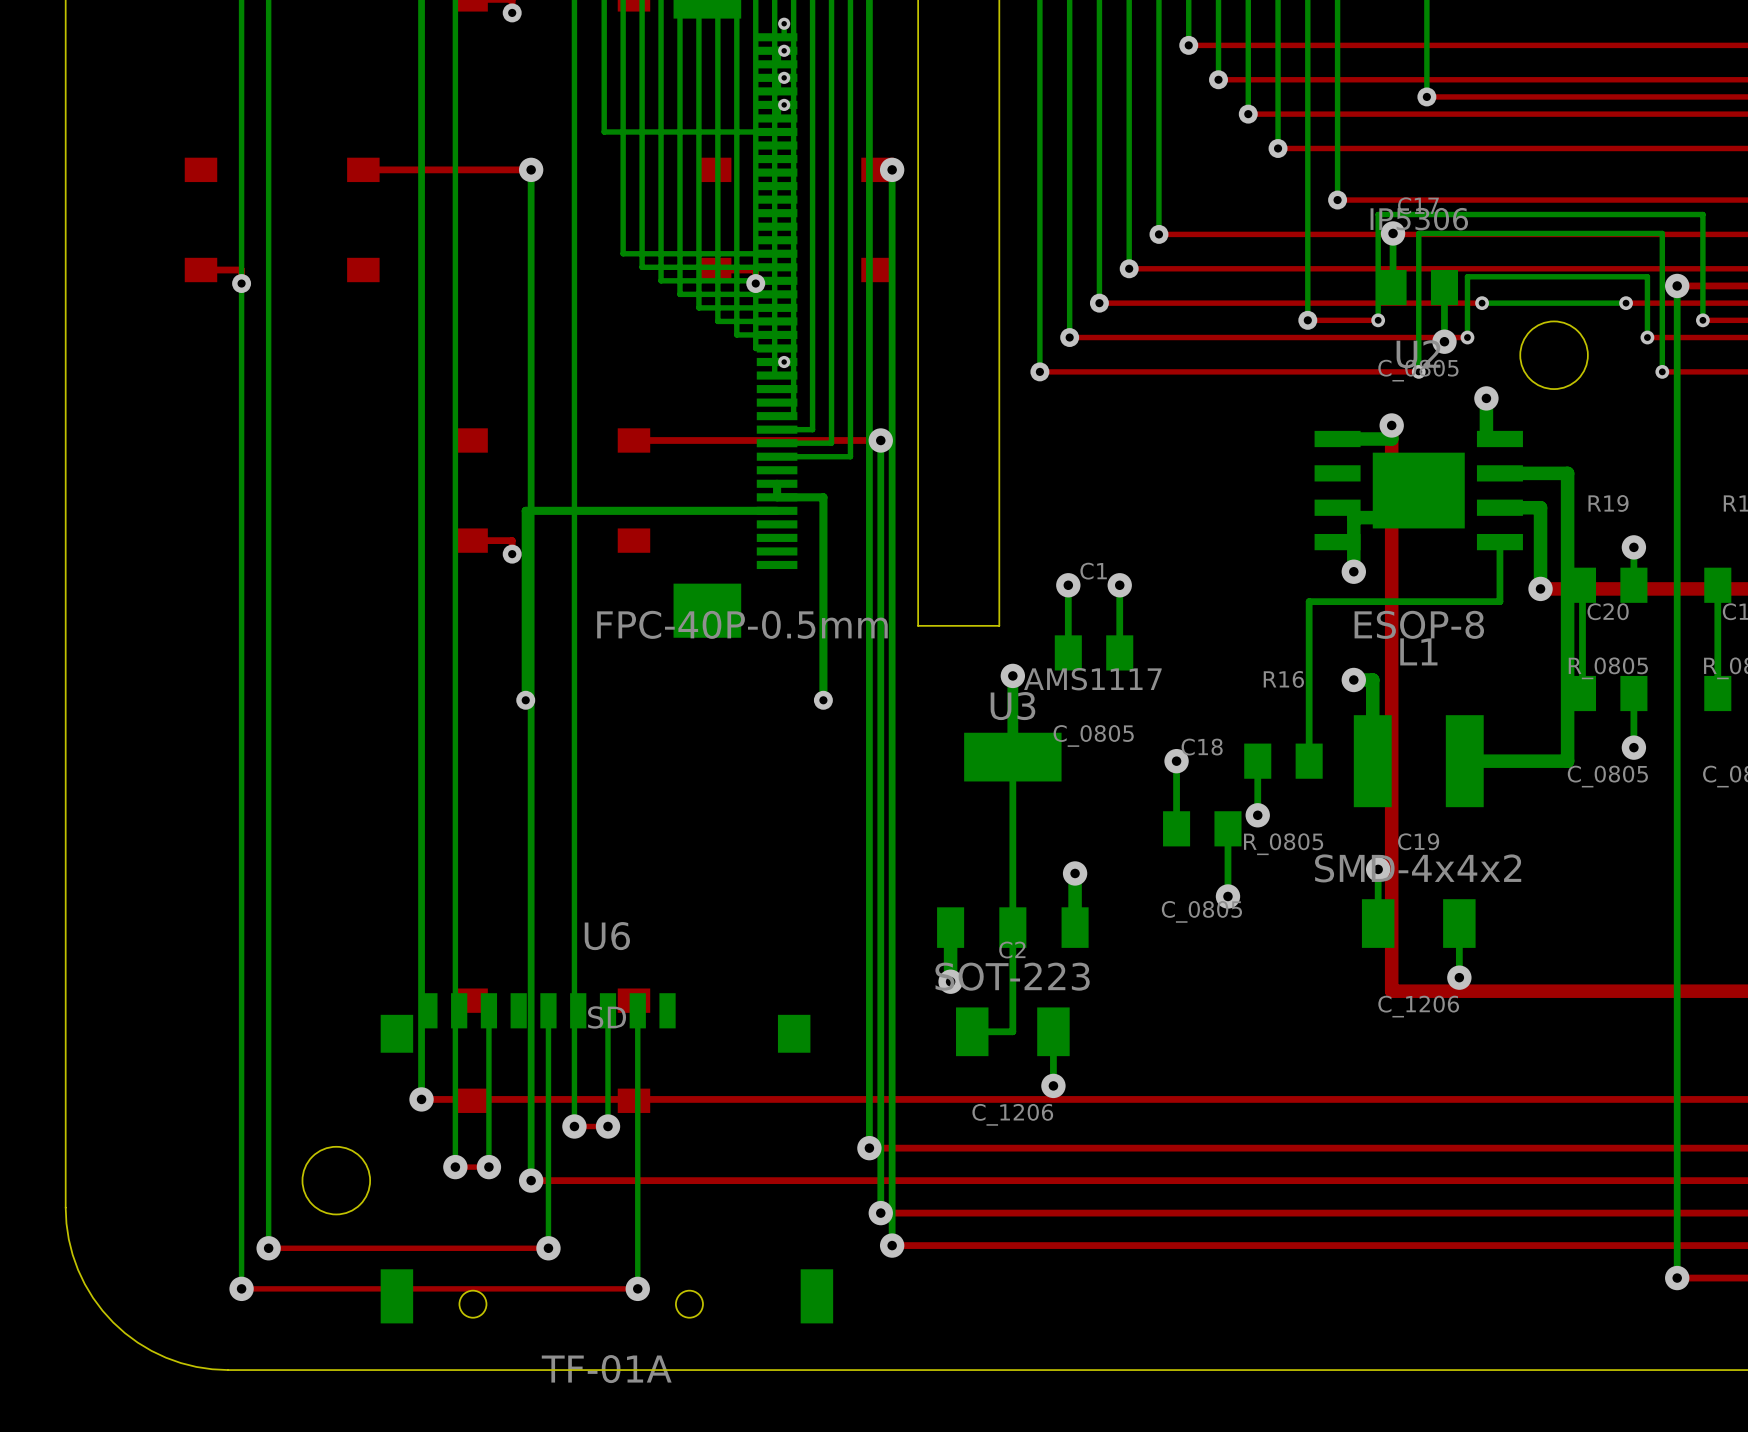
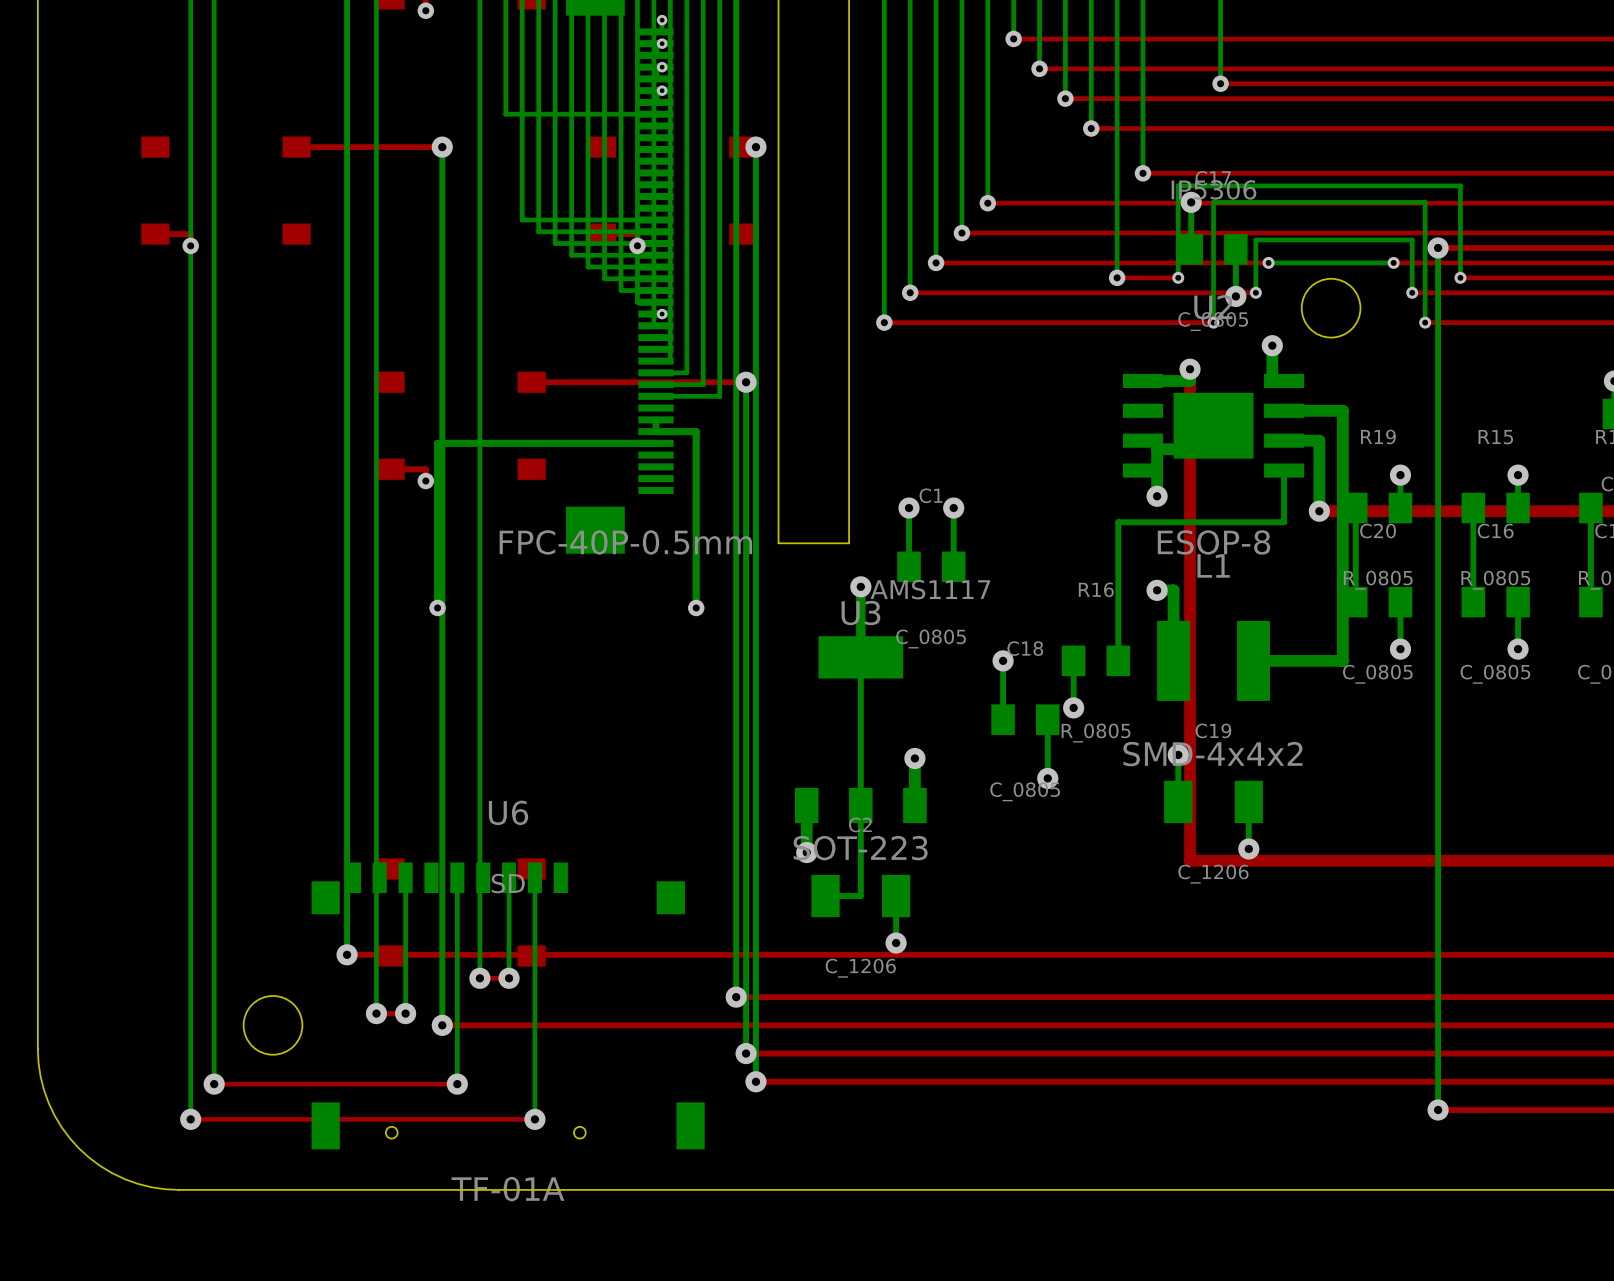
U6 footprint: [380, 993, 834, 1324] -> [311, 862, 705, 1150]

